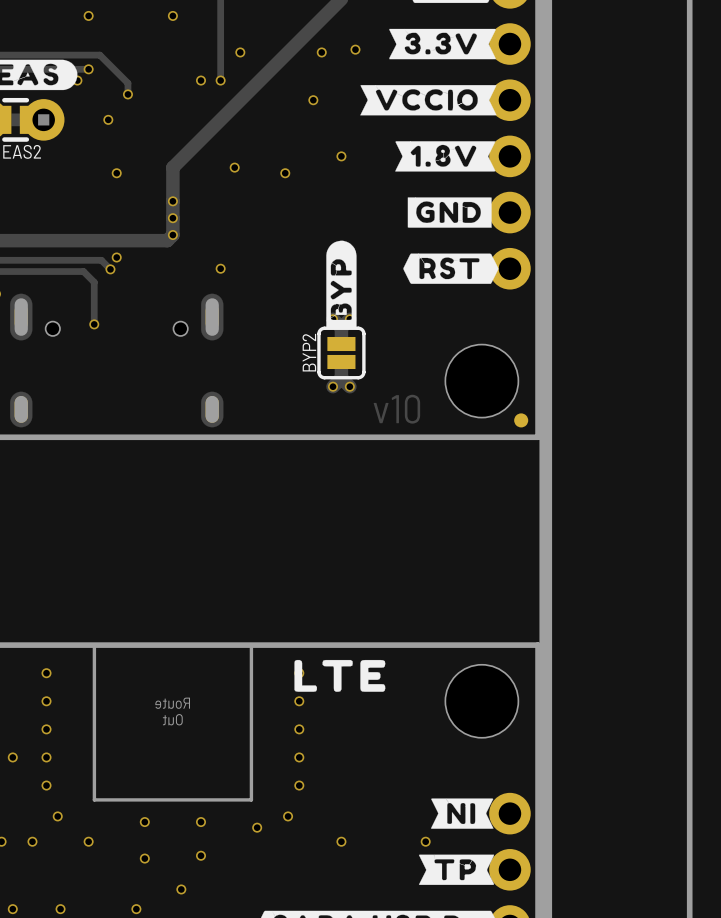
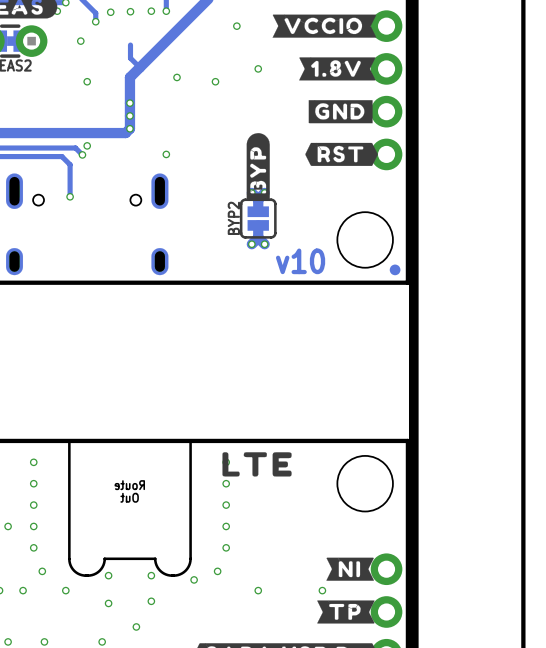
via: none -> (110, 12)
via: none -> (130, 11)
track: none -> (130, 45) (130, 58) (139, 67)
part footprint: [92, 643, 254, 802] -> [68, 439, 192, 577]

